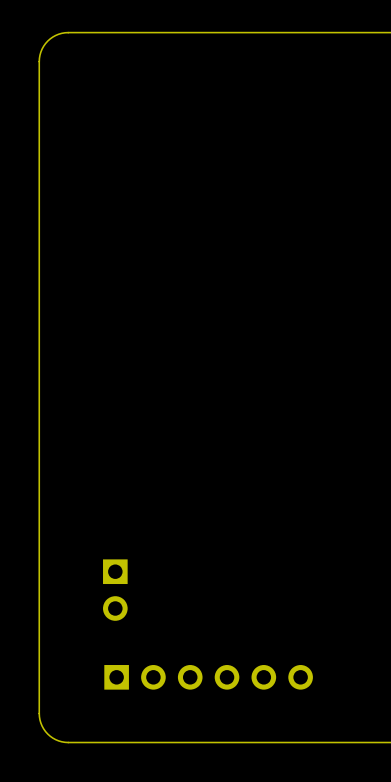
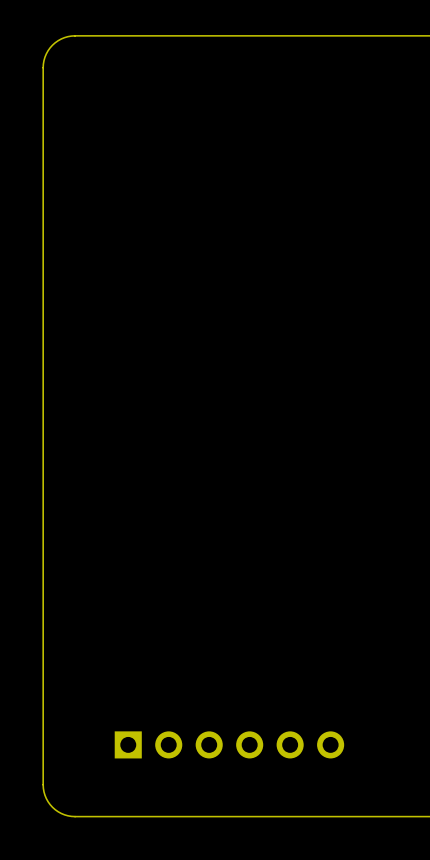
part: (115, 590) -> none

